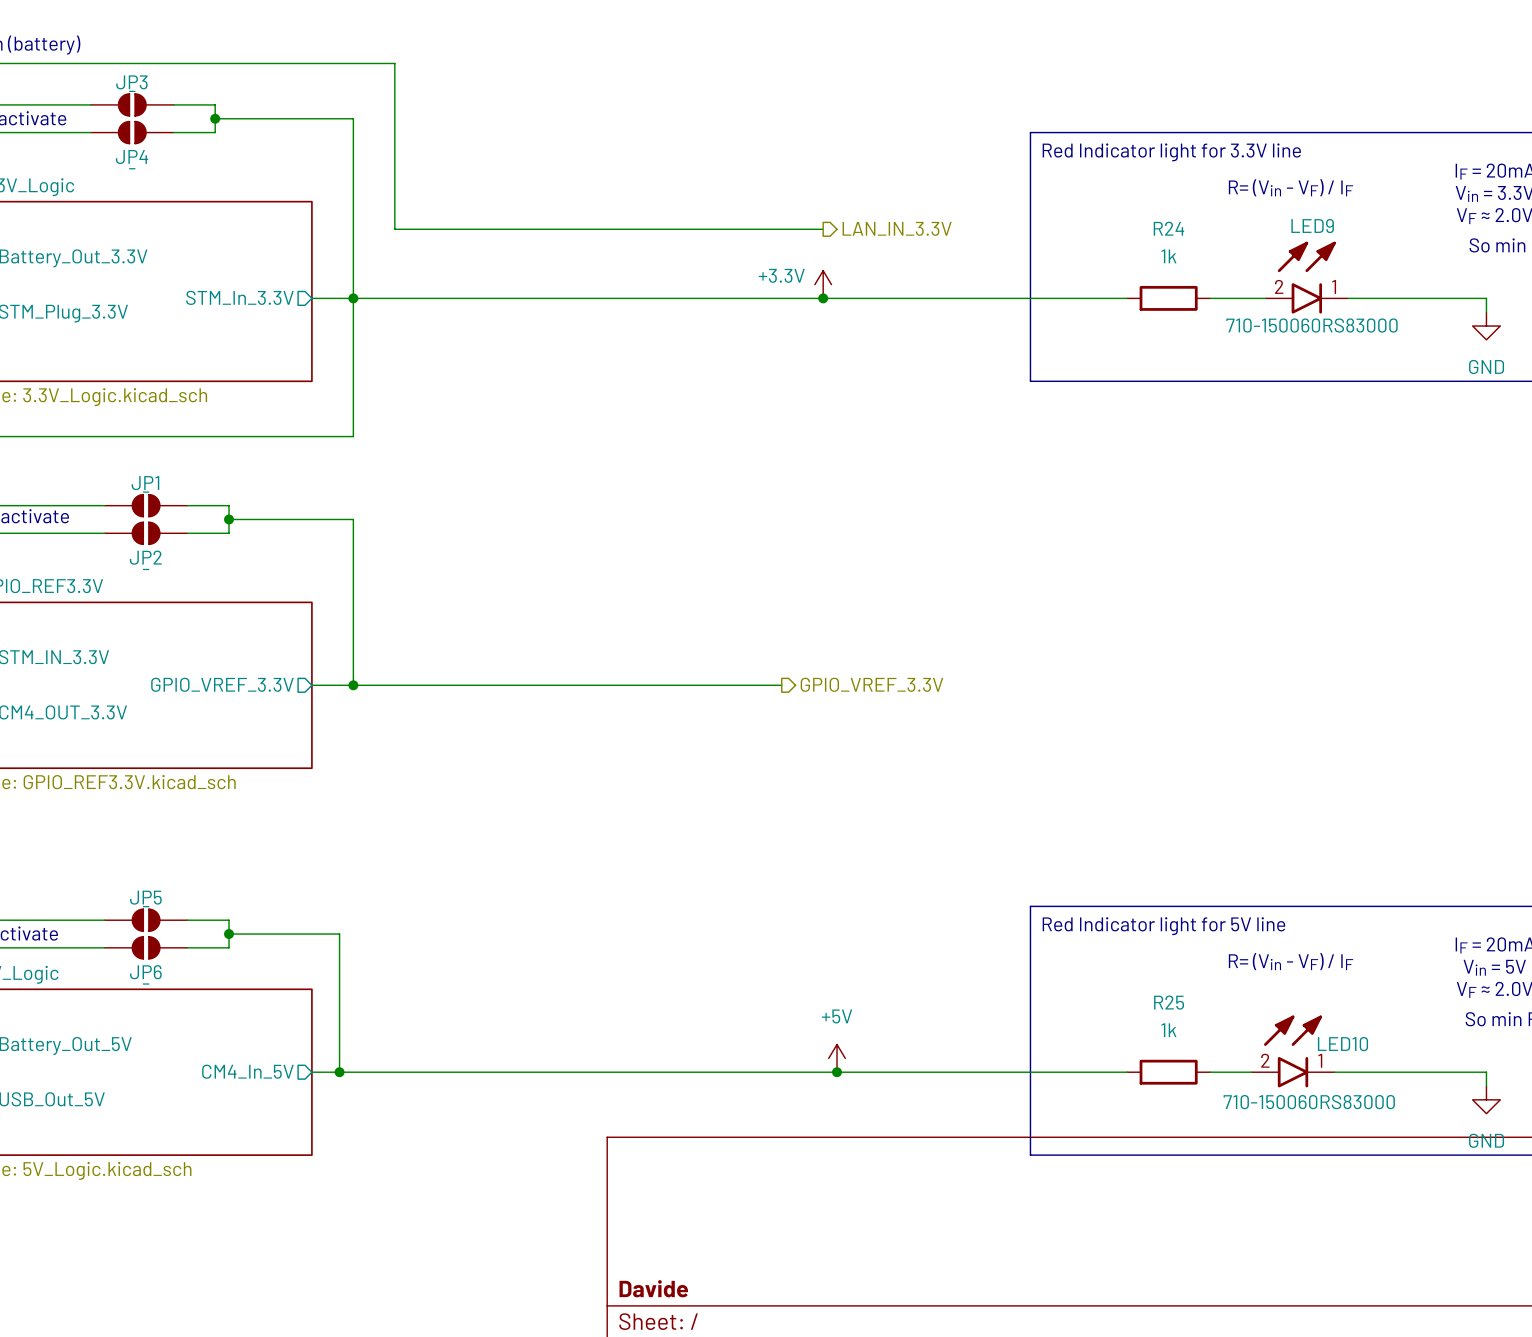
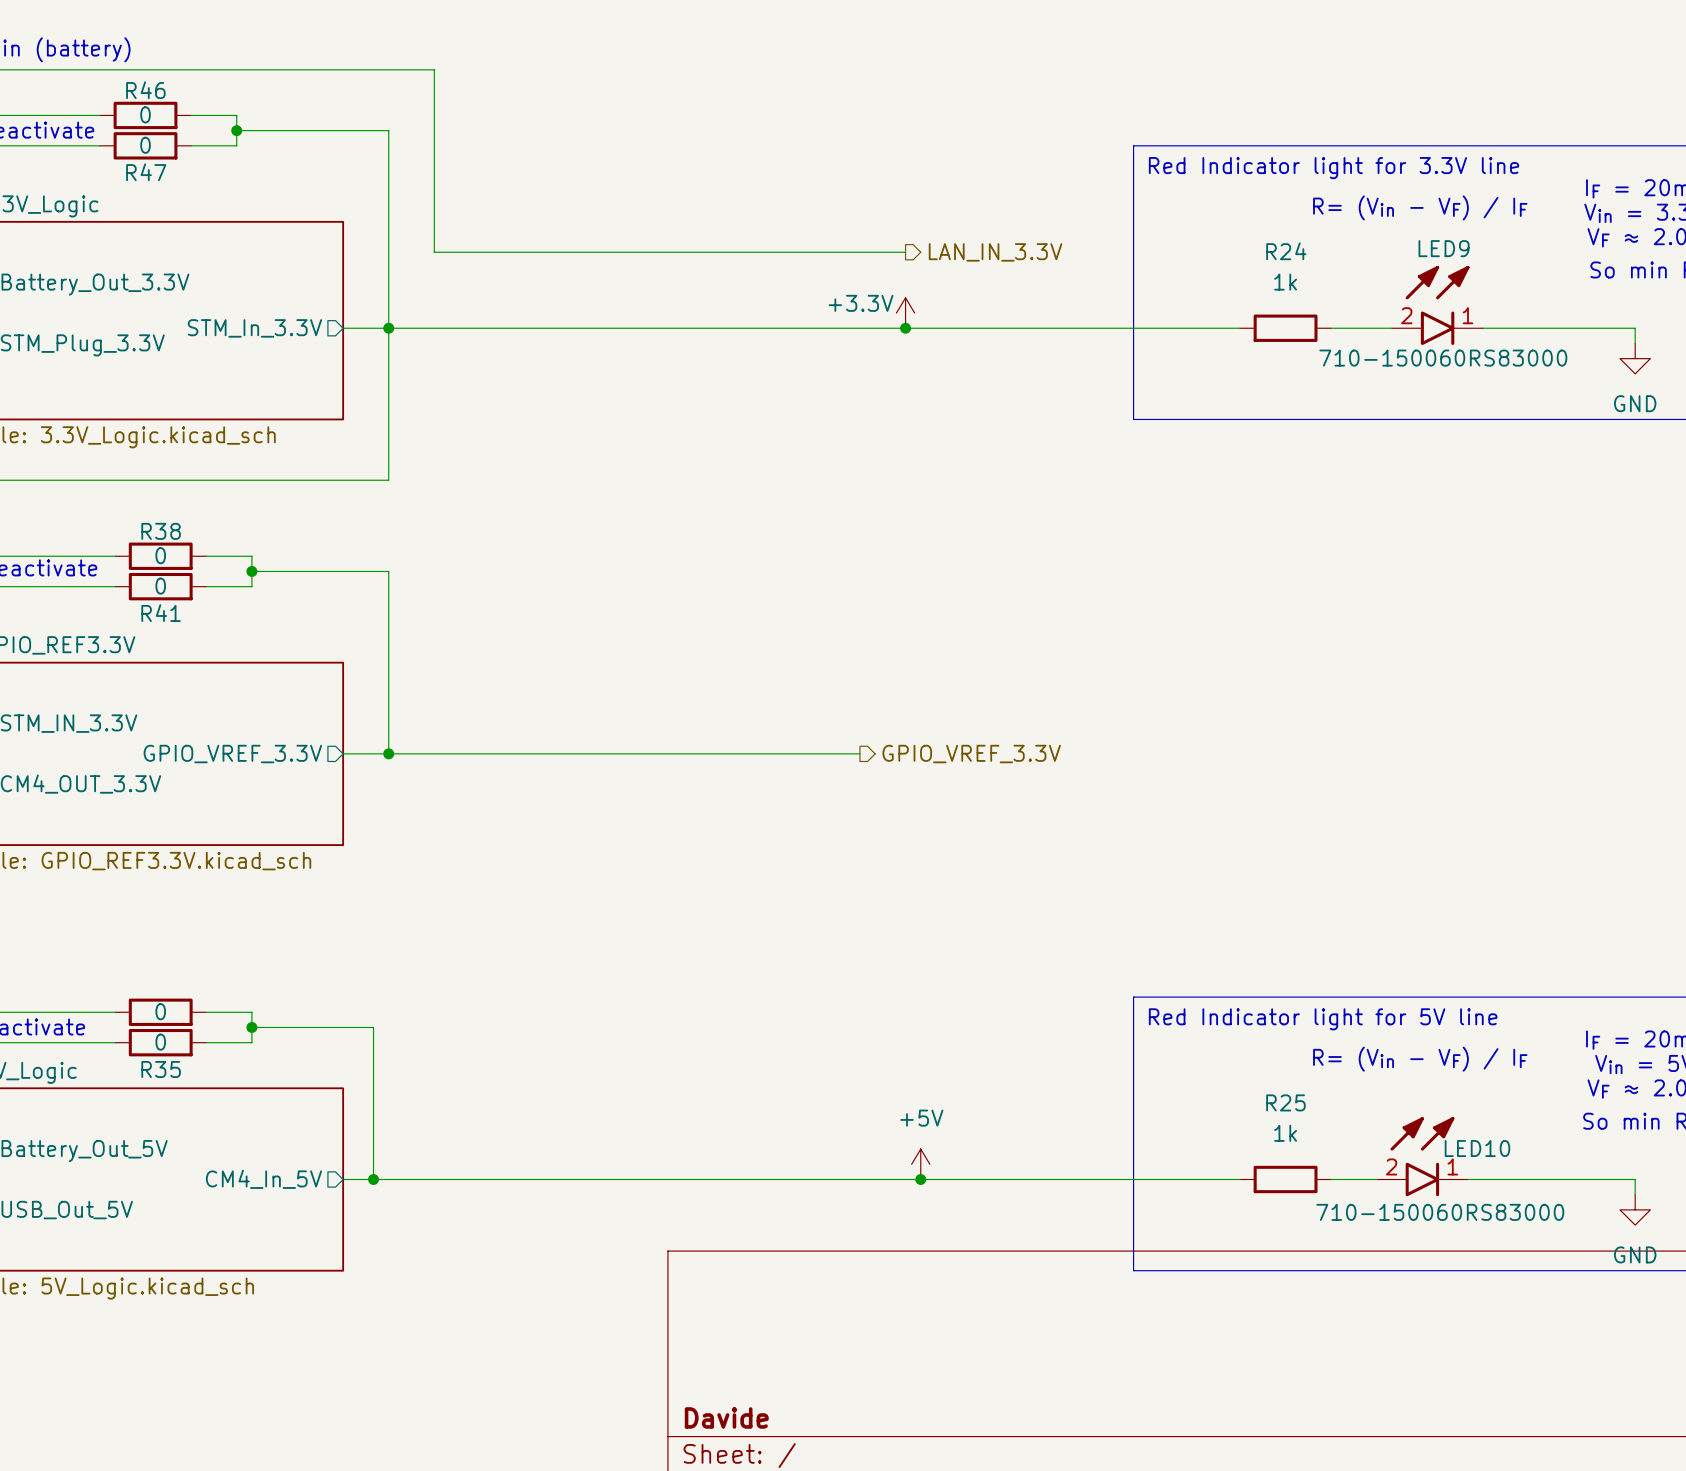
JP3: - (132, 104) -> none
R46: none -> 0 (145, 115)
JP4: - (132, 132) -> none
R47: none -> 0 (145, 145)
JP1: - (146, 505) -> none
R38: none -> 0 (160, 556)
JP2: - (146, 533) -> none
R41: none -> 0 (160, 586)
JP5: - (146, 920) -> none
part: none -> 0 (160, 1012)
JP6: - (146, 947) -> none
R35: none -> 0 (160, 1042)

